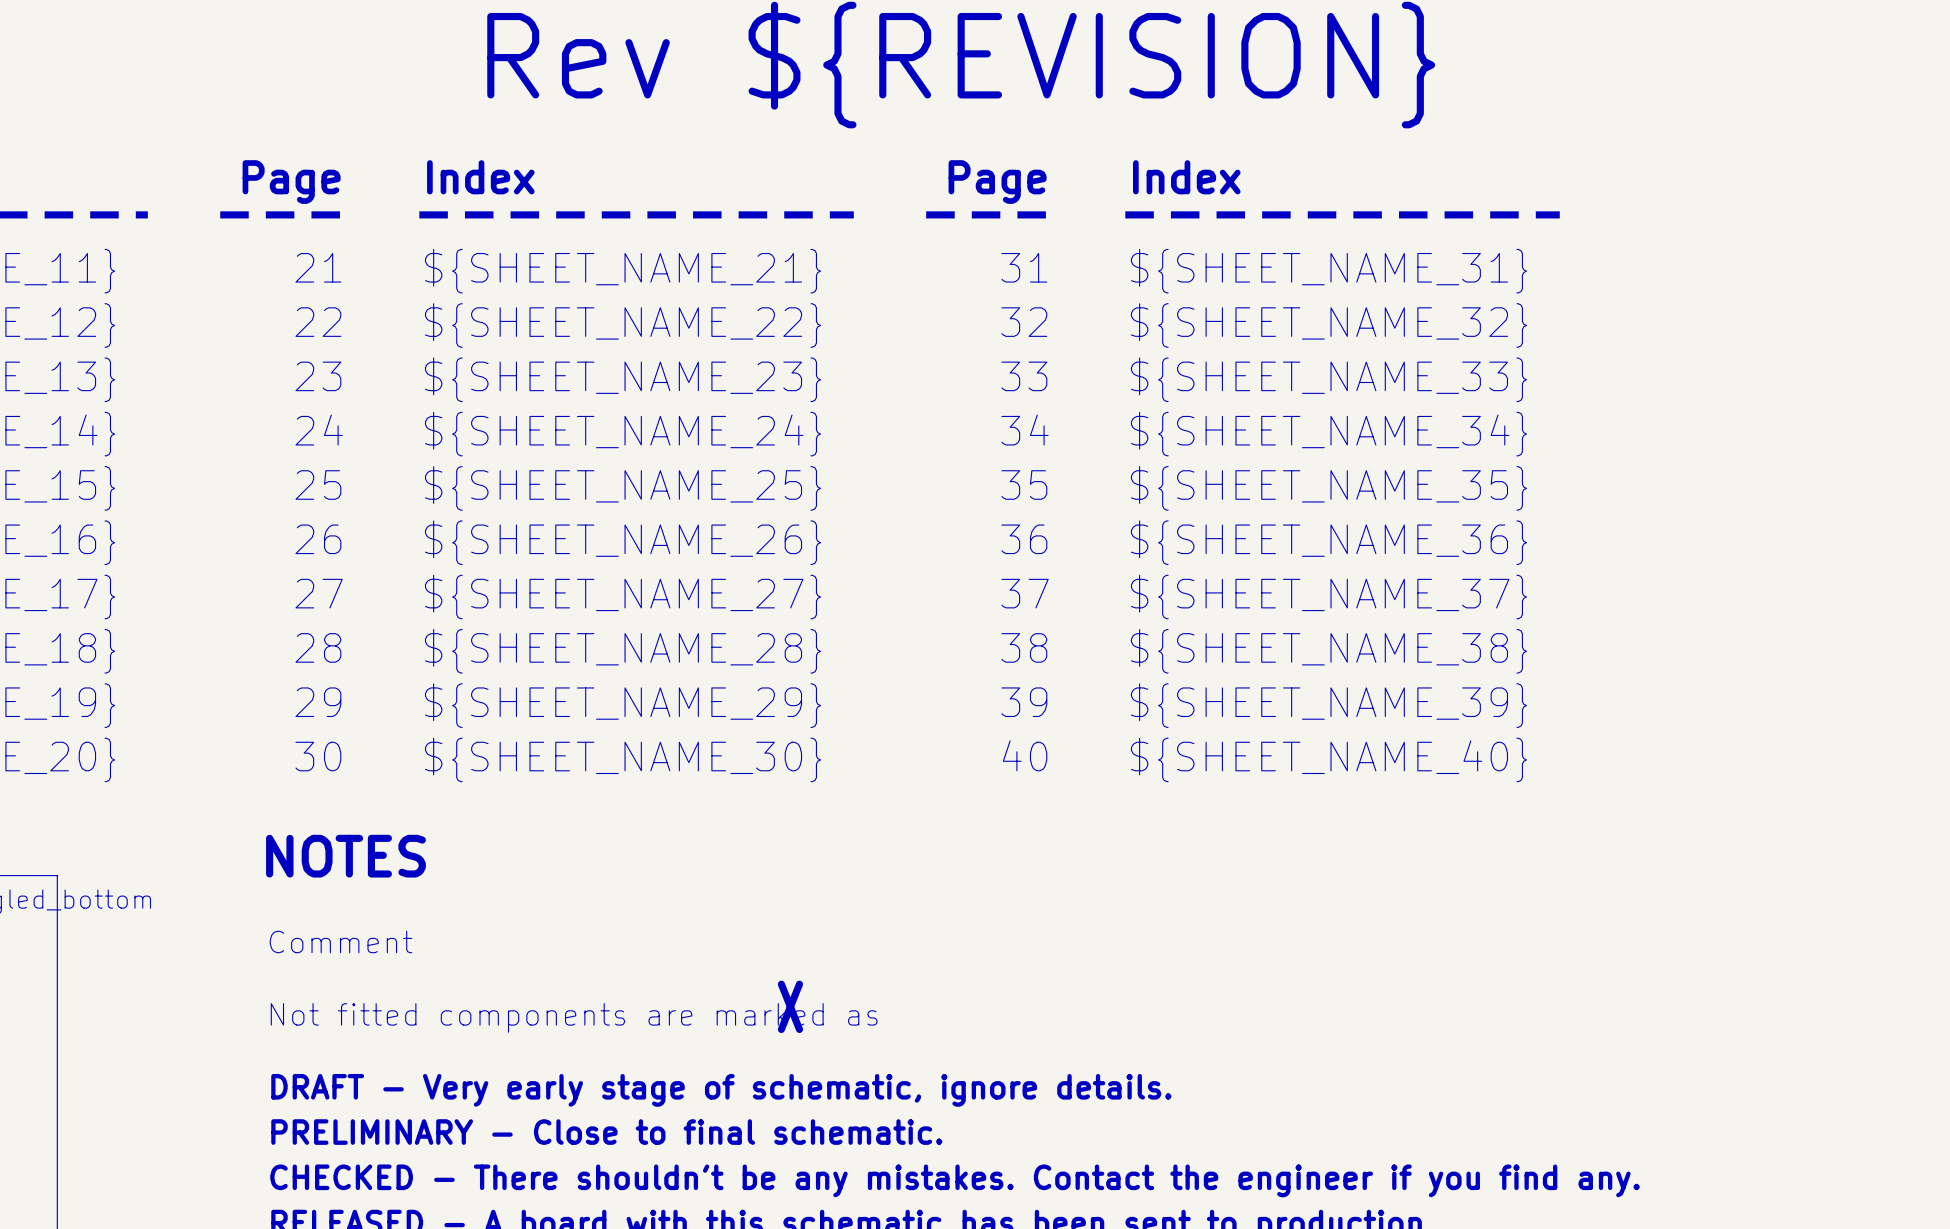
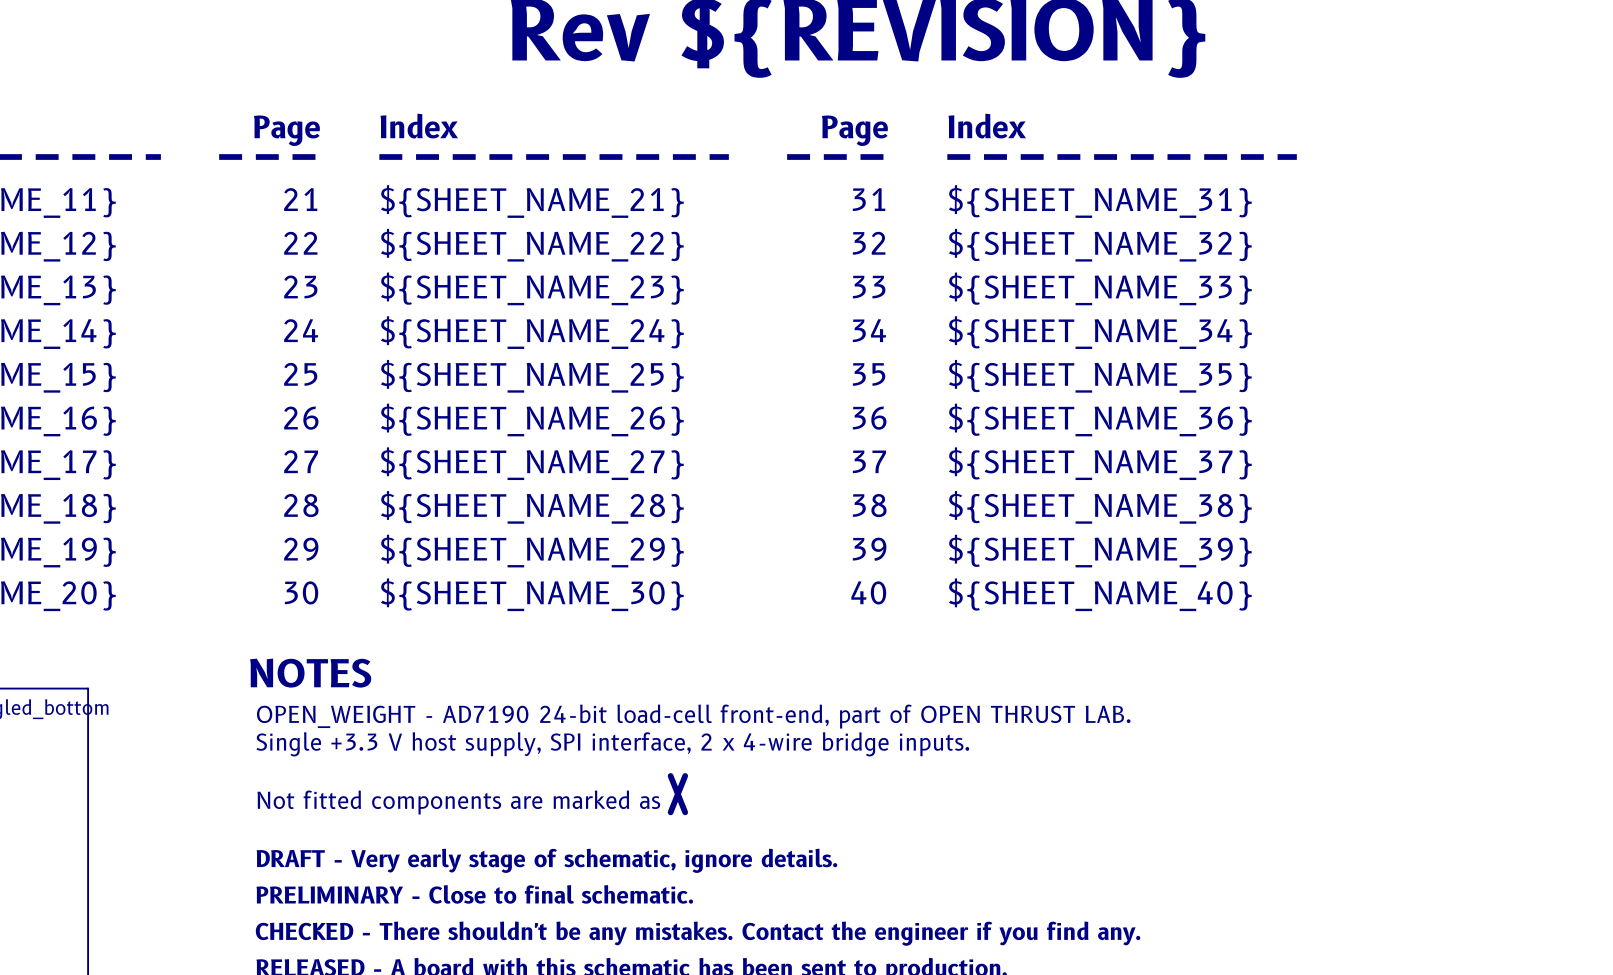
text: none -> OPEN_WEIGHT - AD7190 24-bit load-cell front-end, part of OPEN THRUST LAB. (693, 716)
text: Comment (341, 941) -> Single +3.3 V host supply, SPI interface, 2 x 4-wire bridge inputs. (612, 744)

